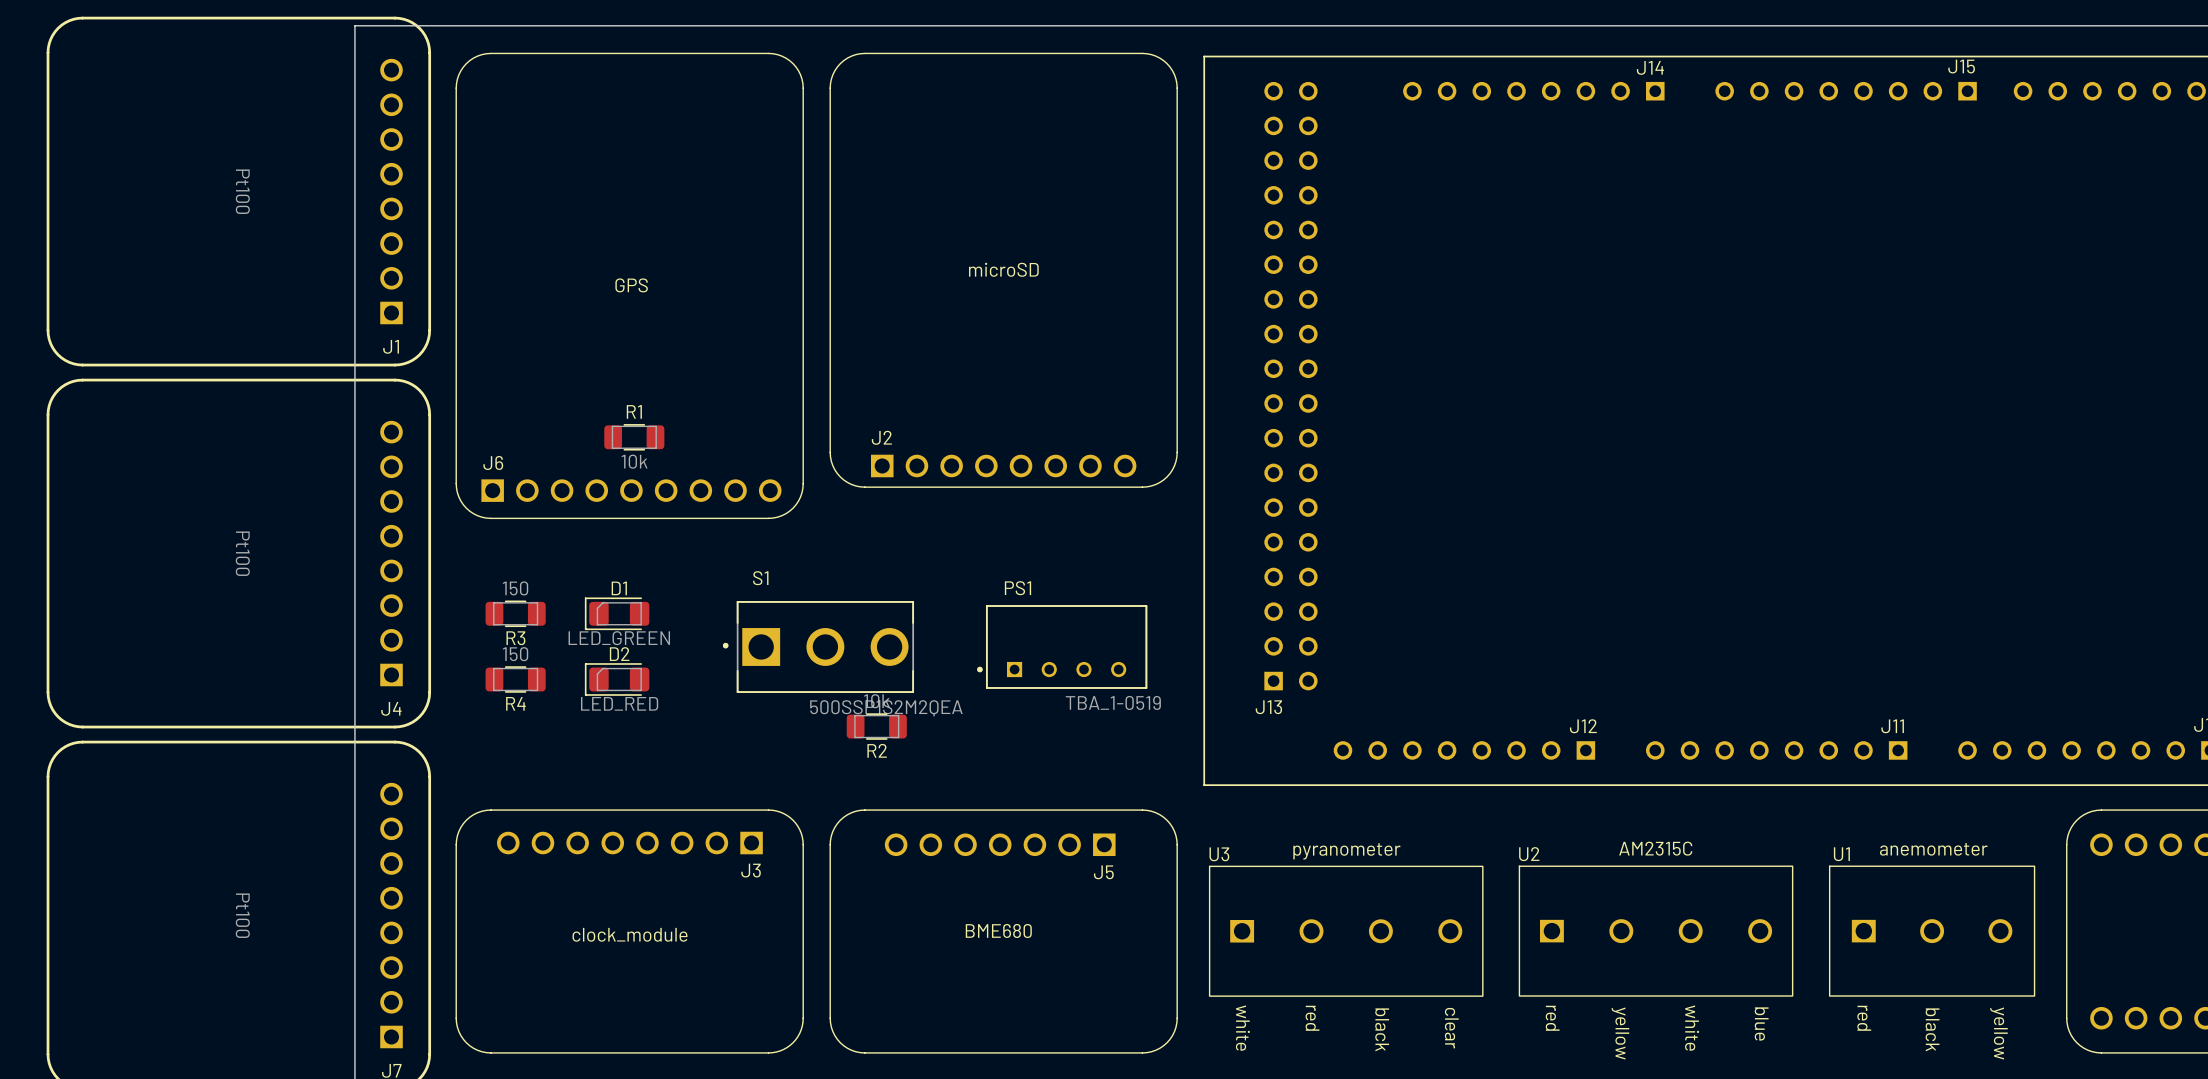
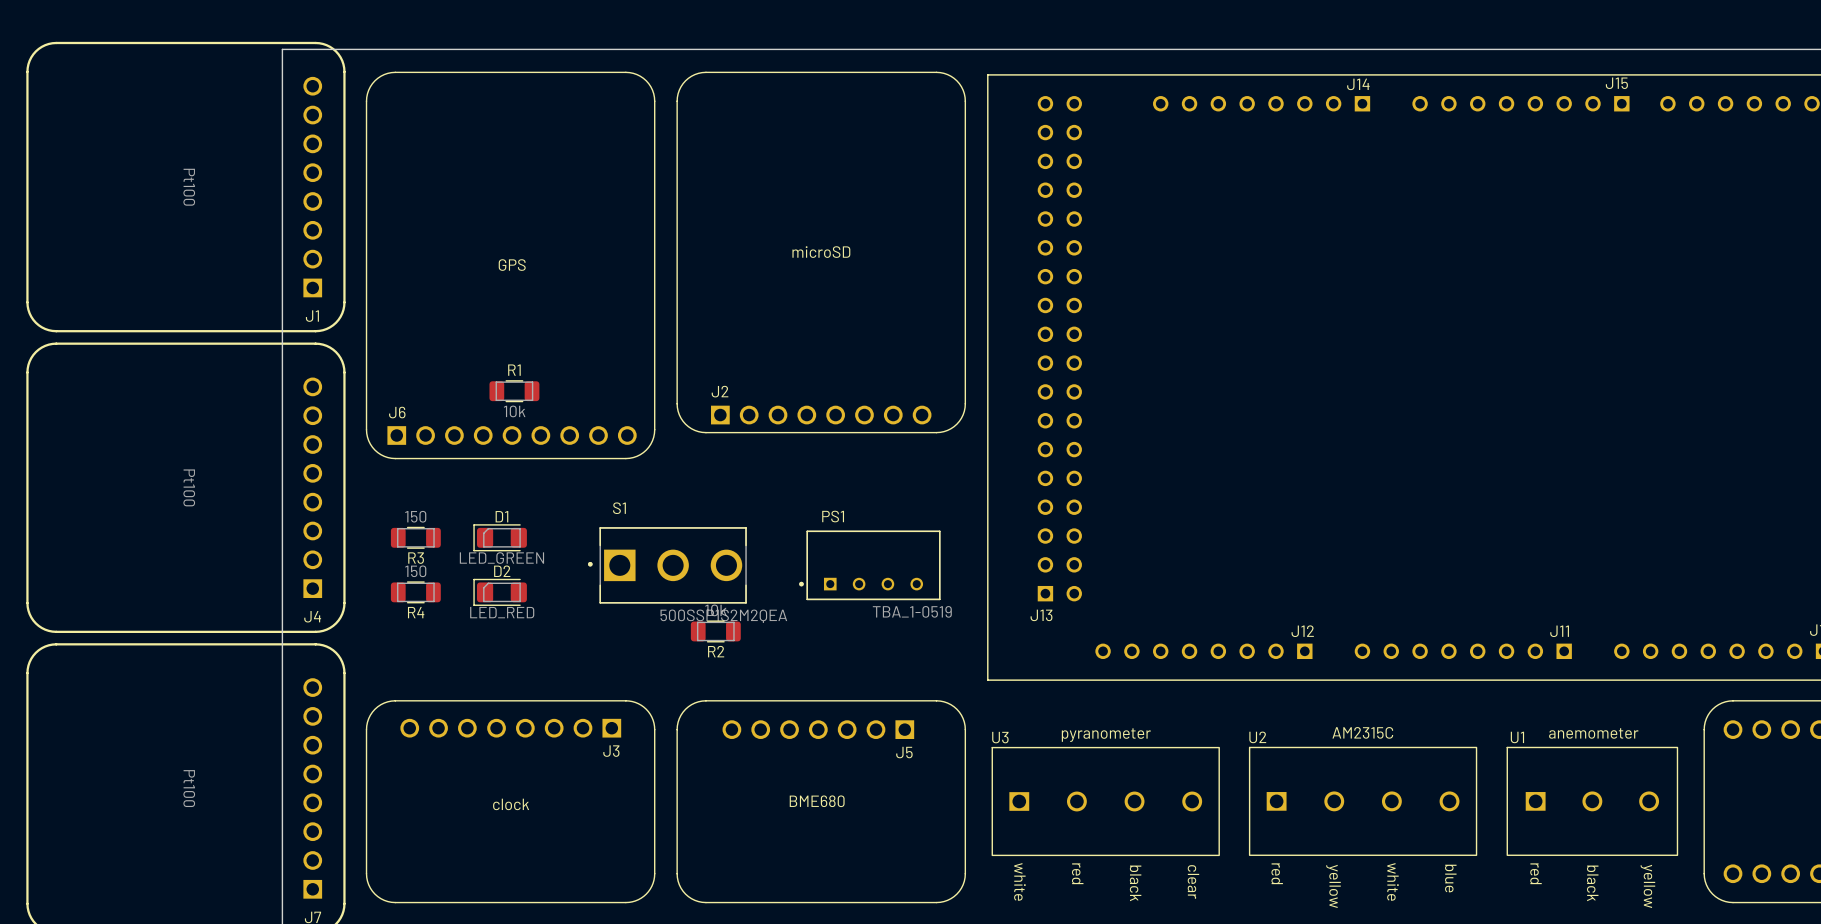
J3 value: clock_module (629, 934) -> clock (511, 804)

